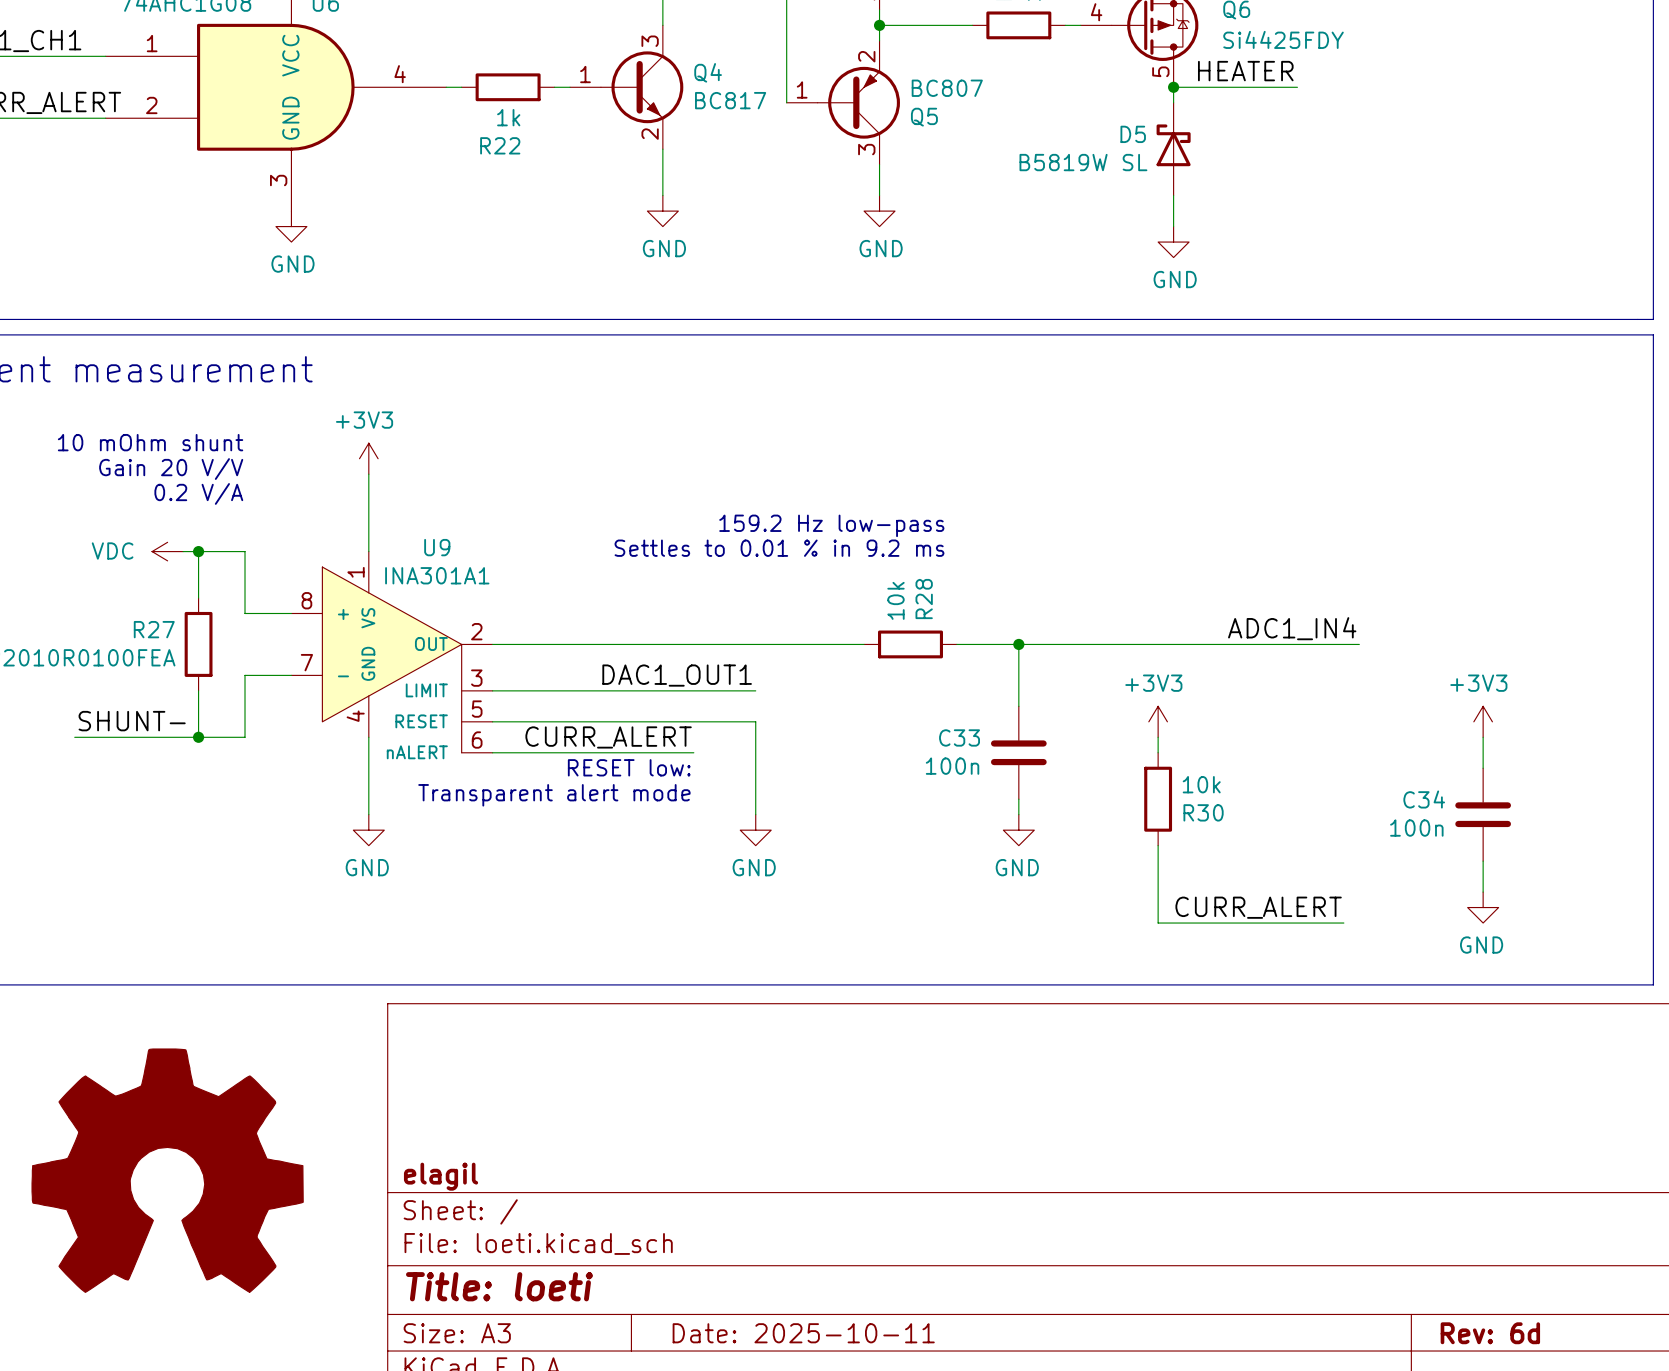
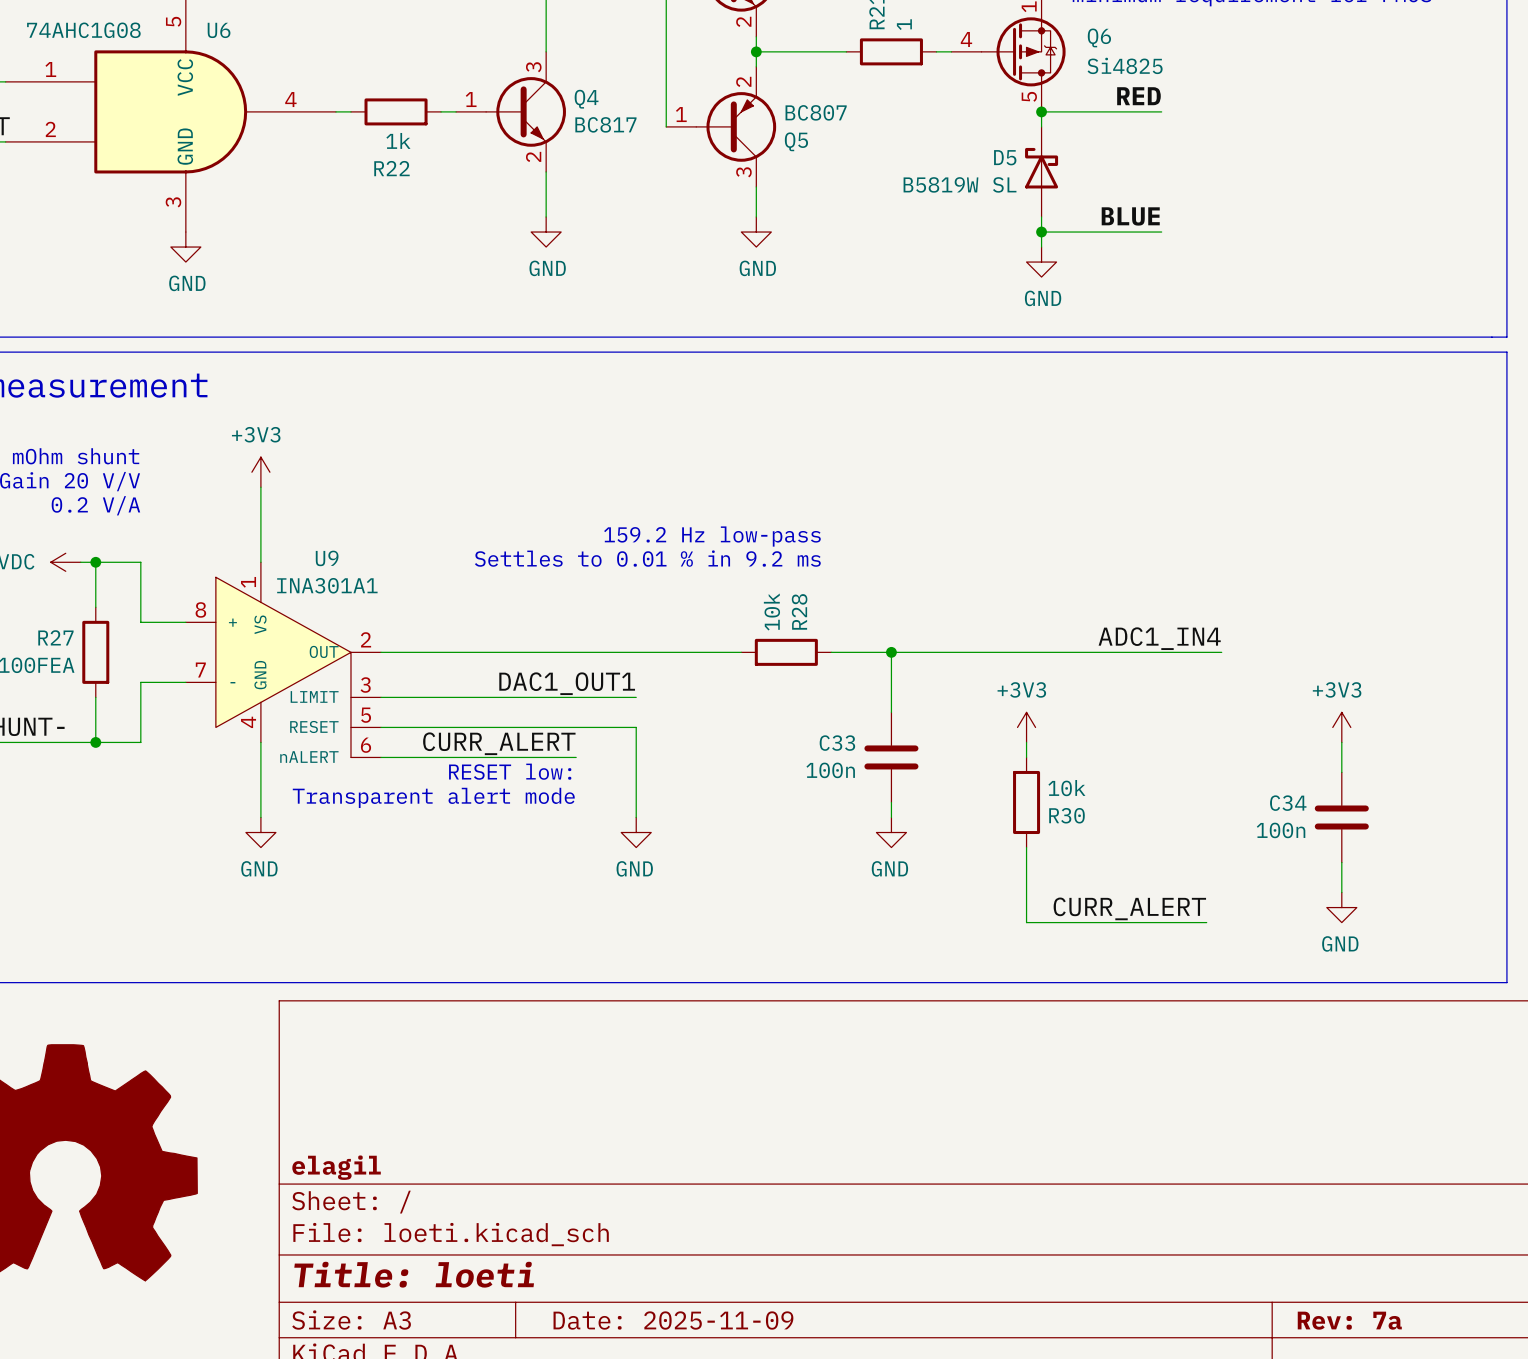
Q6 value: Si4425FDY (1283, 39) -> Si4825 (1125, 65)
label: HEATER (1245, 71) -> RED (1138, 96)
label: none -> BLUE (1130, 216)
wire: none -> (1041, 232) (1161, 232)
junction: none -> (1041, 232)
title block: Date: 2025-10-11 (803, 1333) -> Date: 2025-11-09 (673, 1320)
title block: Rev: 6d (1490, 1333) -> Rev: 7a (1349, 1320)

